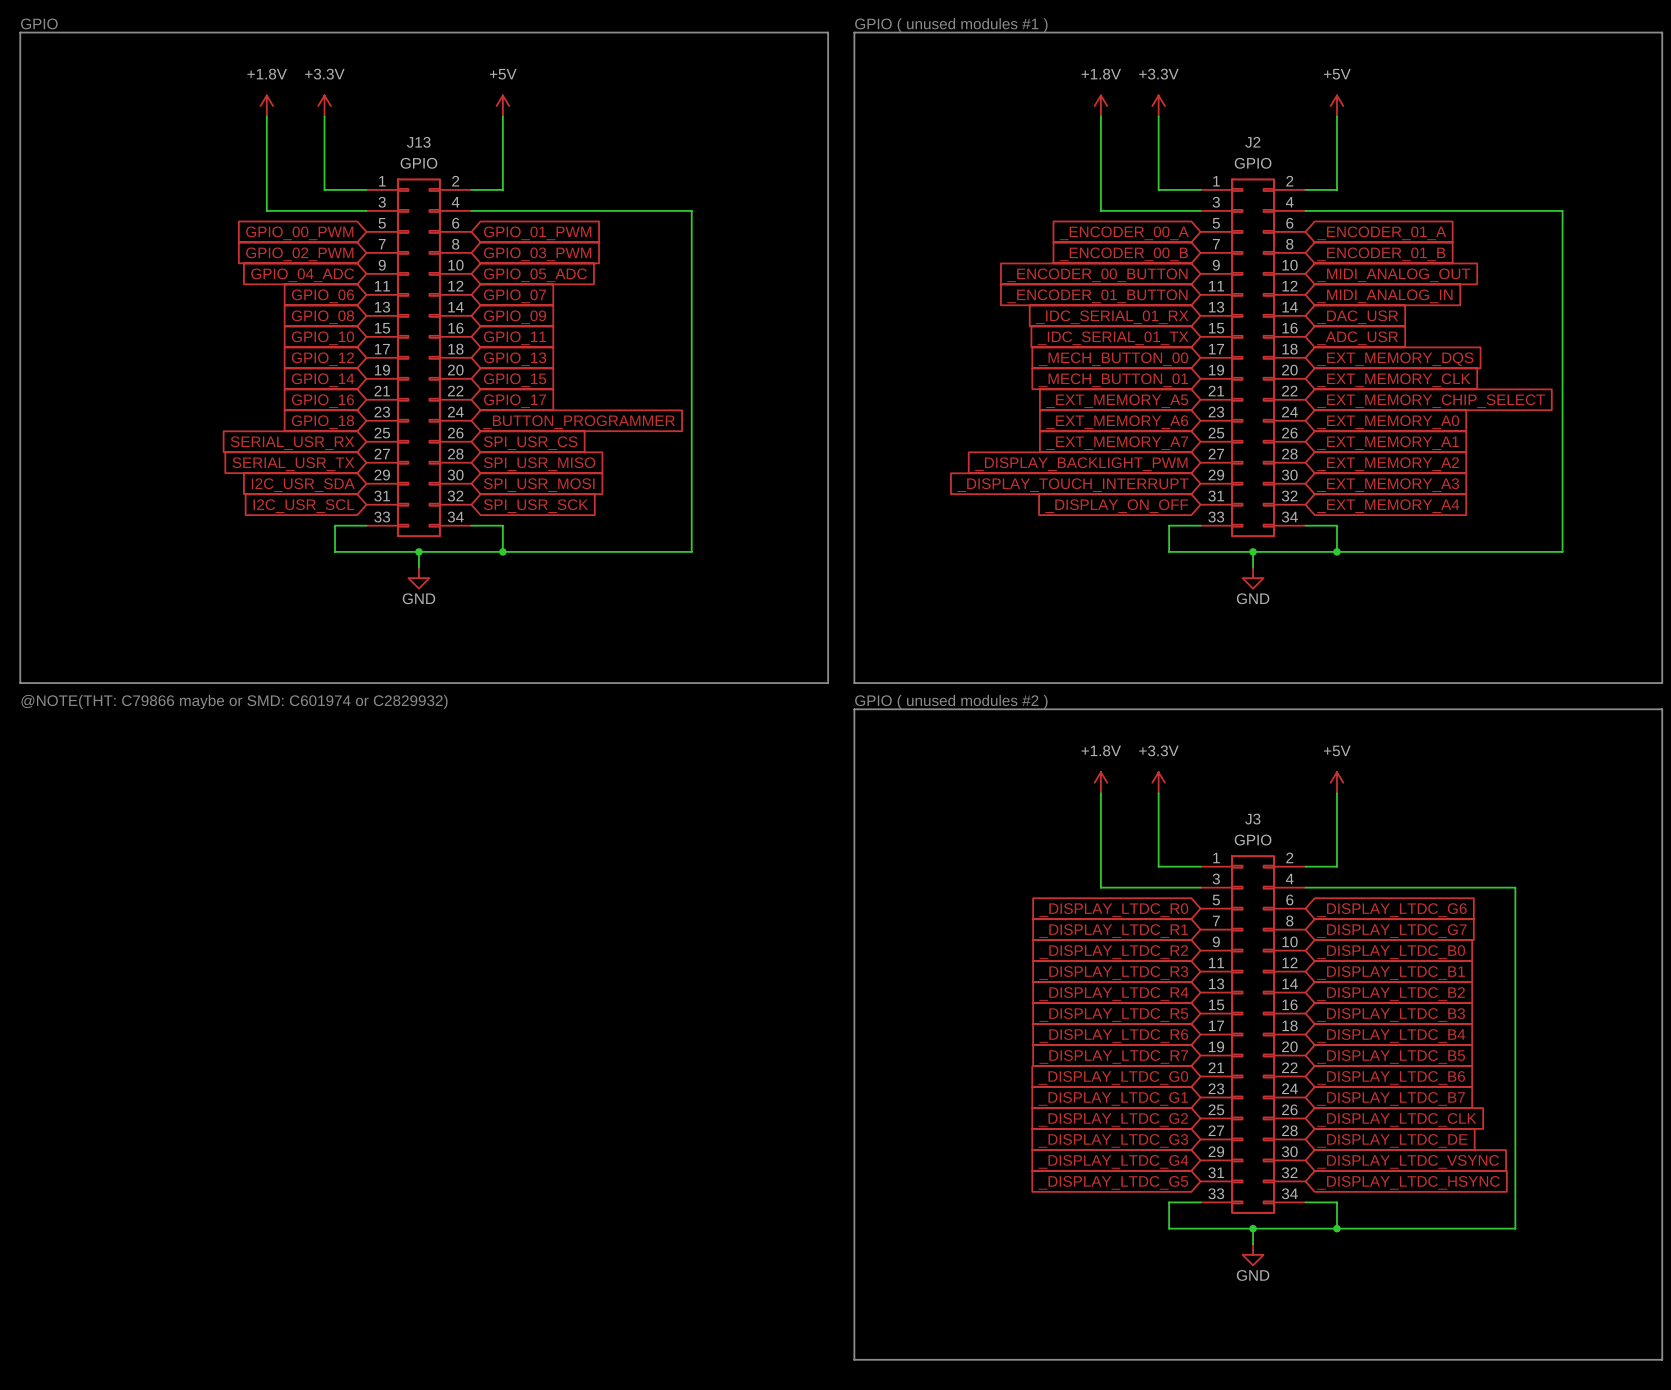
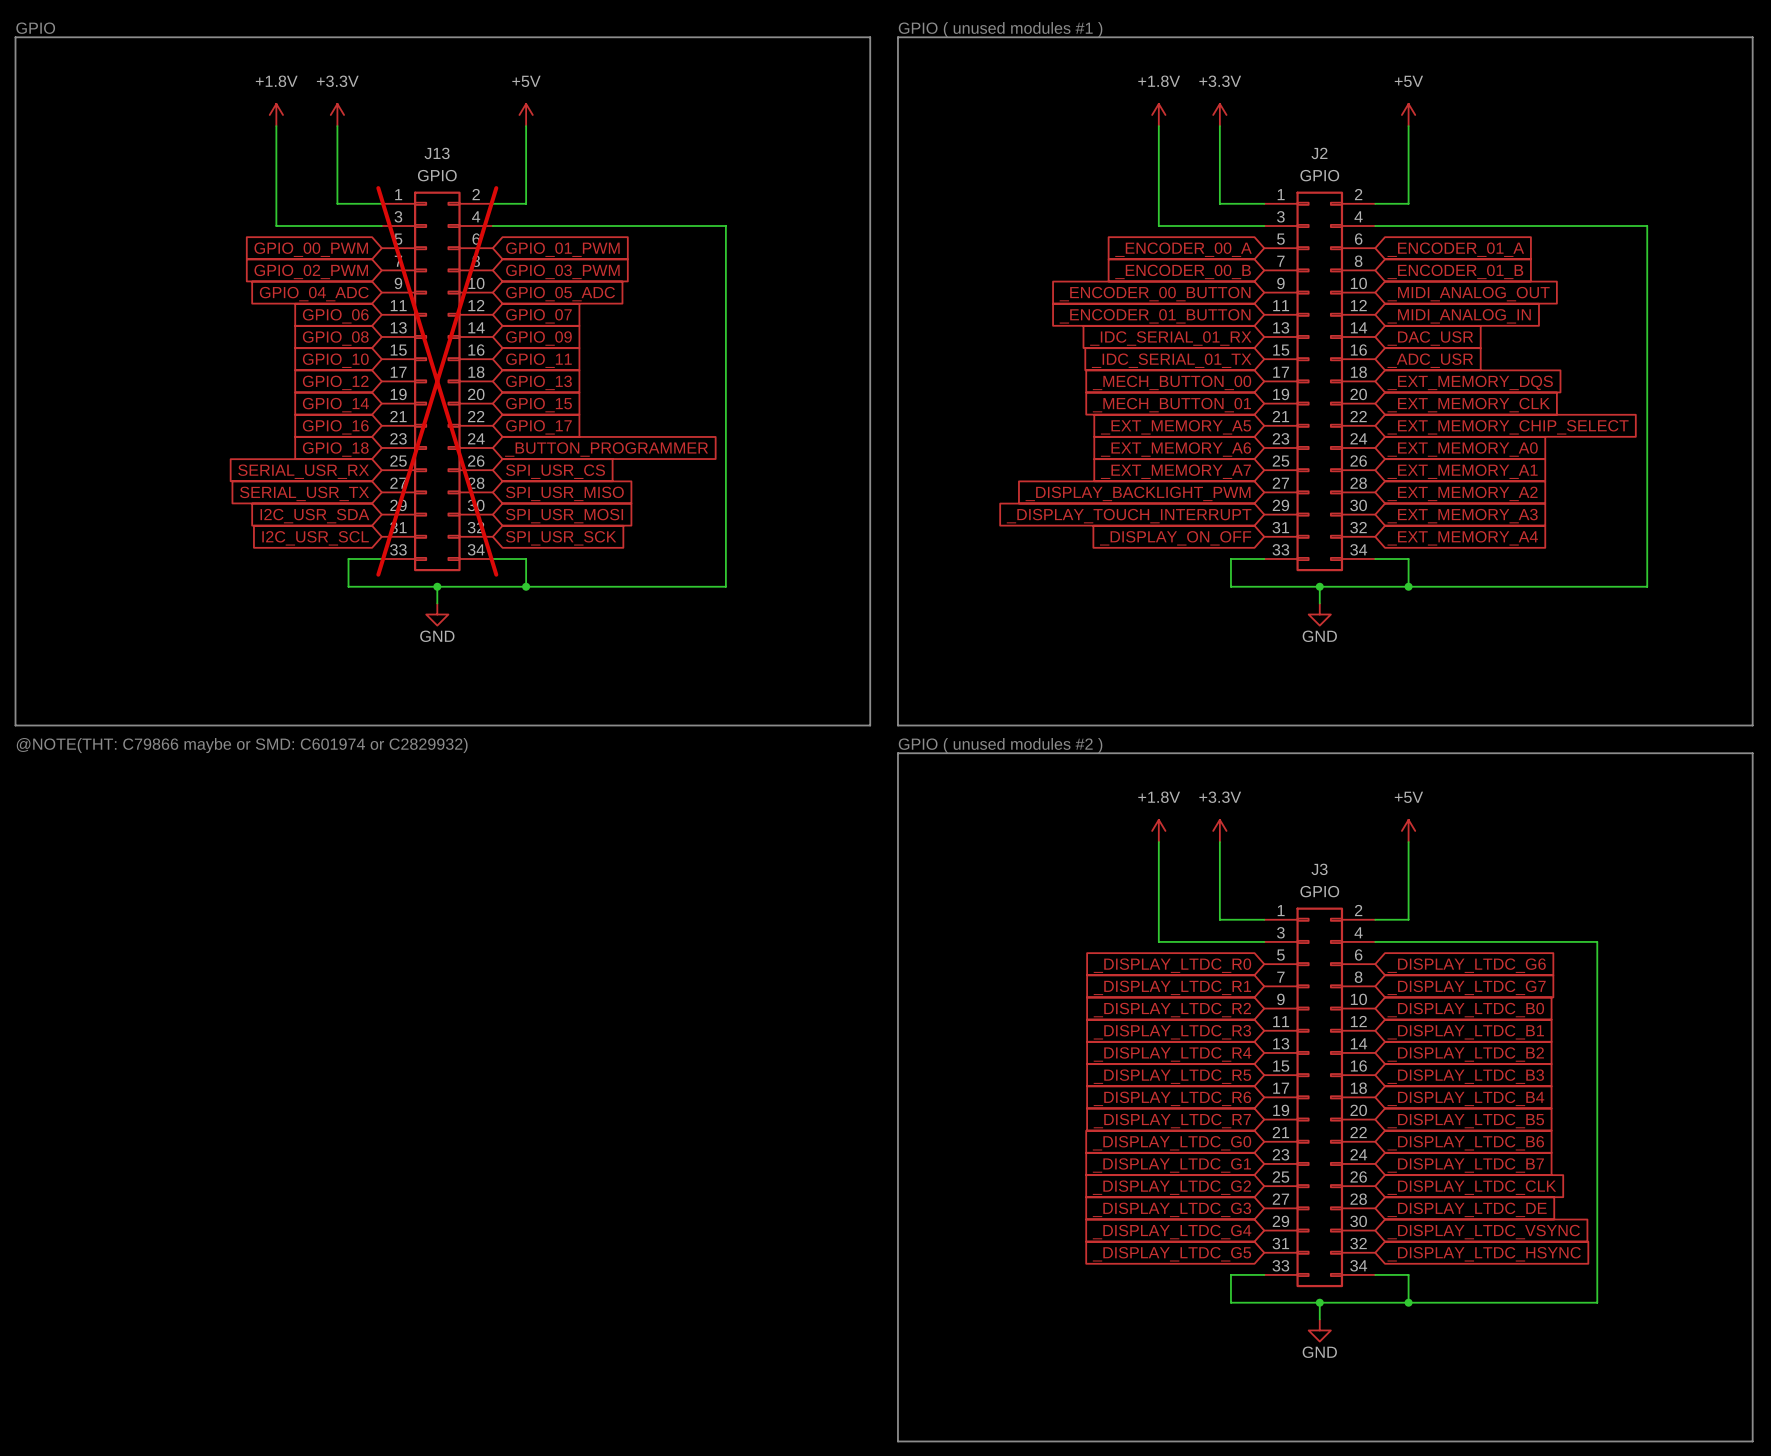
J13 do-not-place cross: none -> (437, 381)

